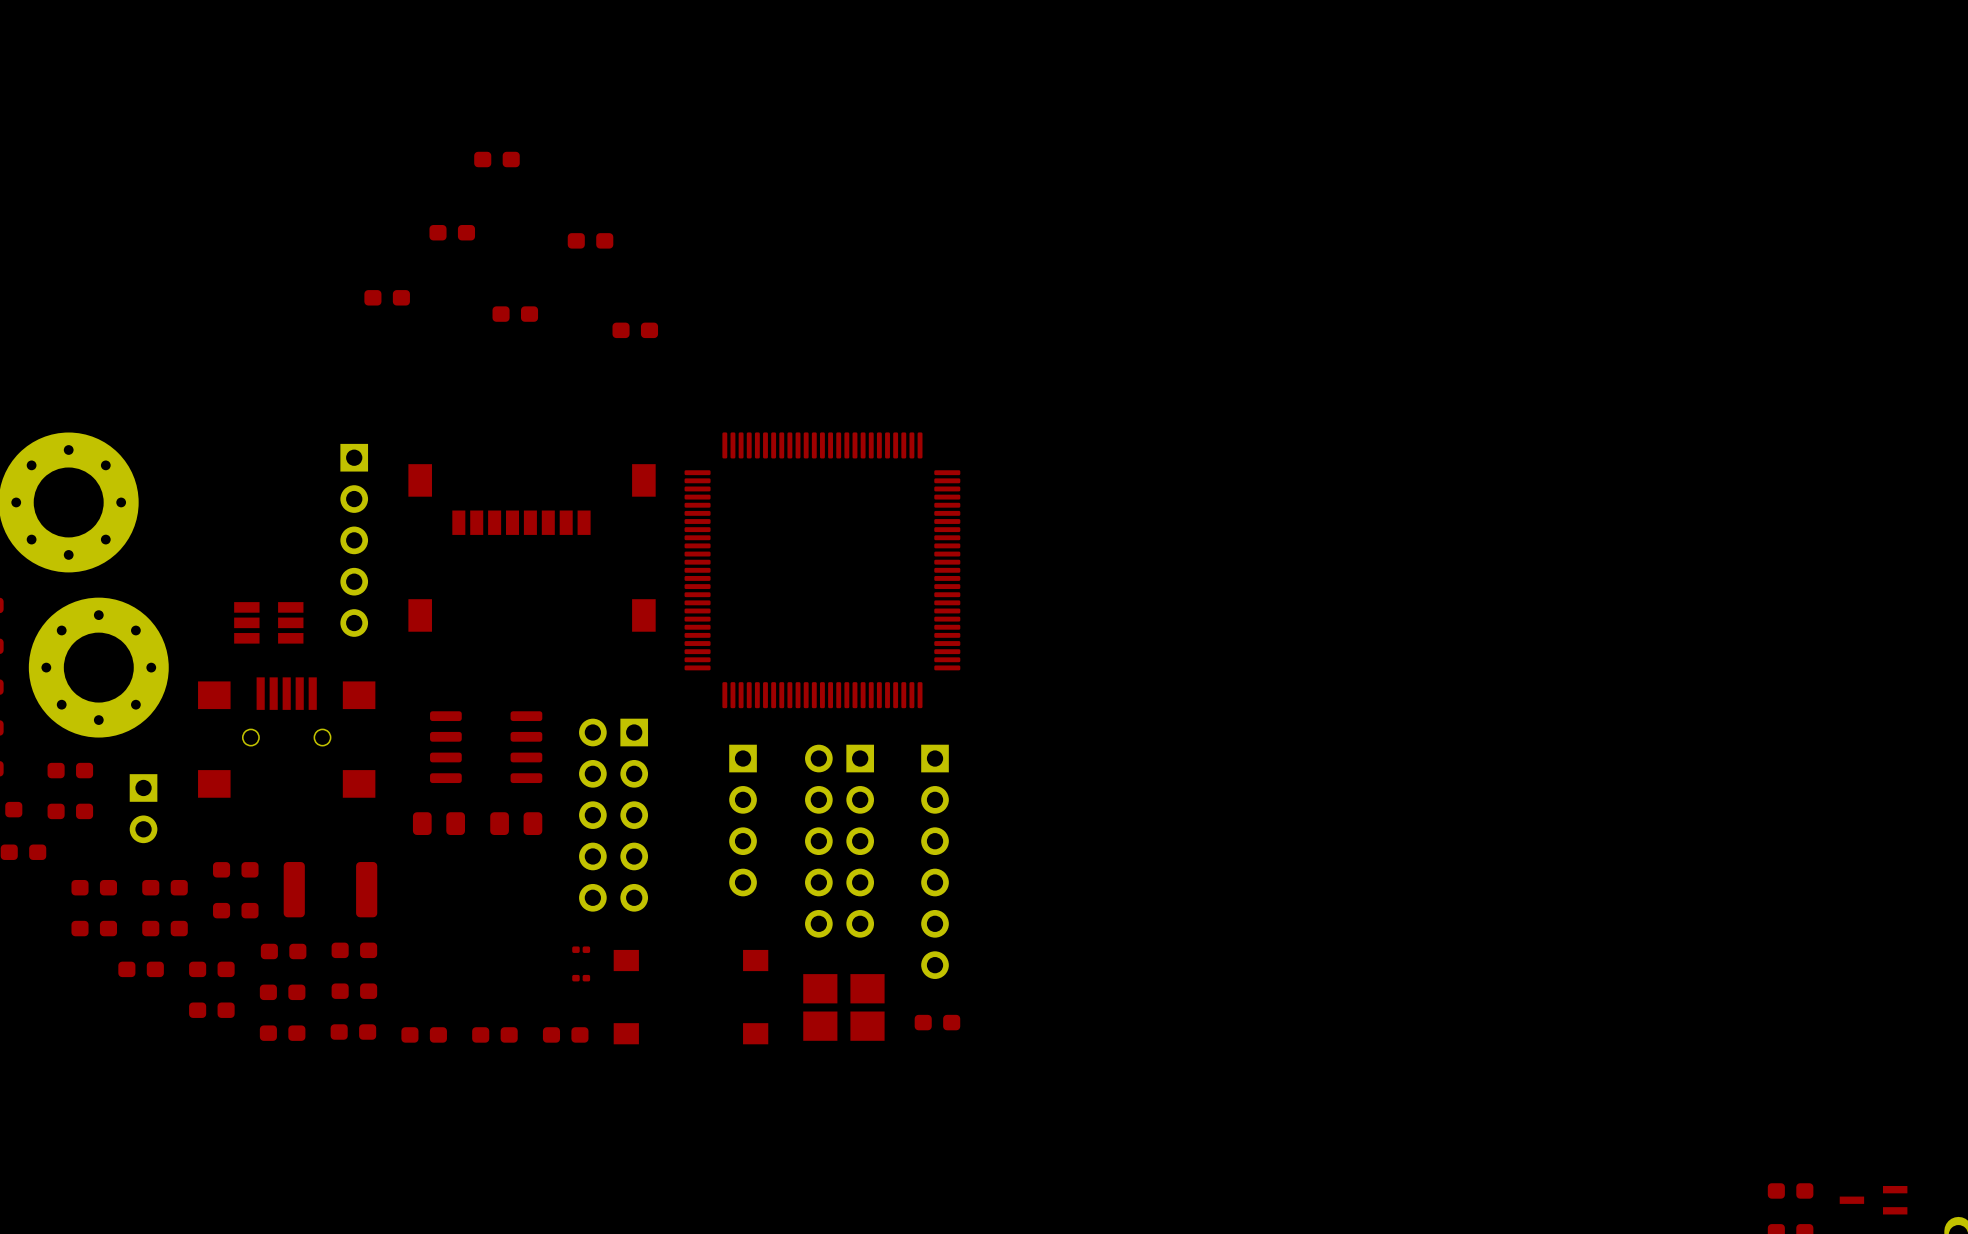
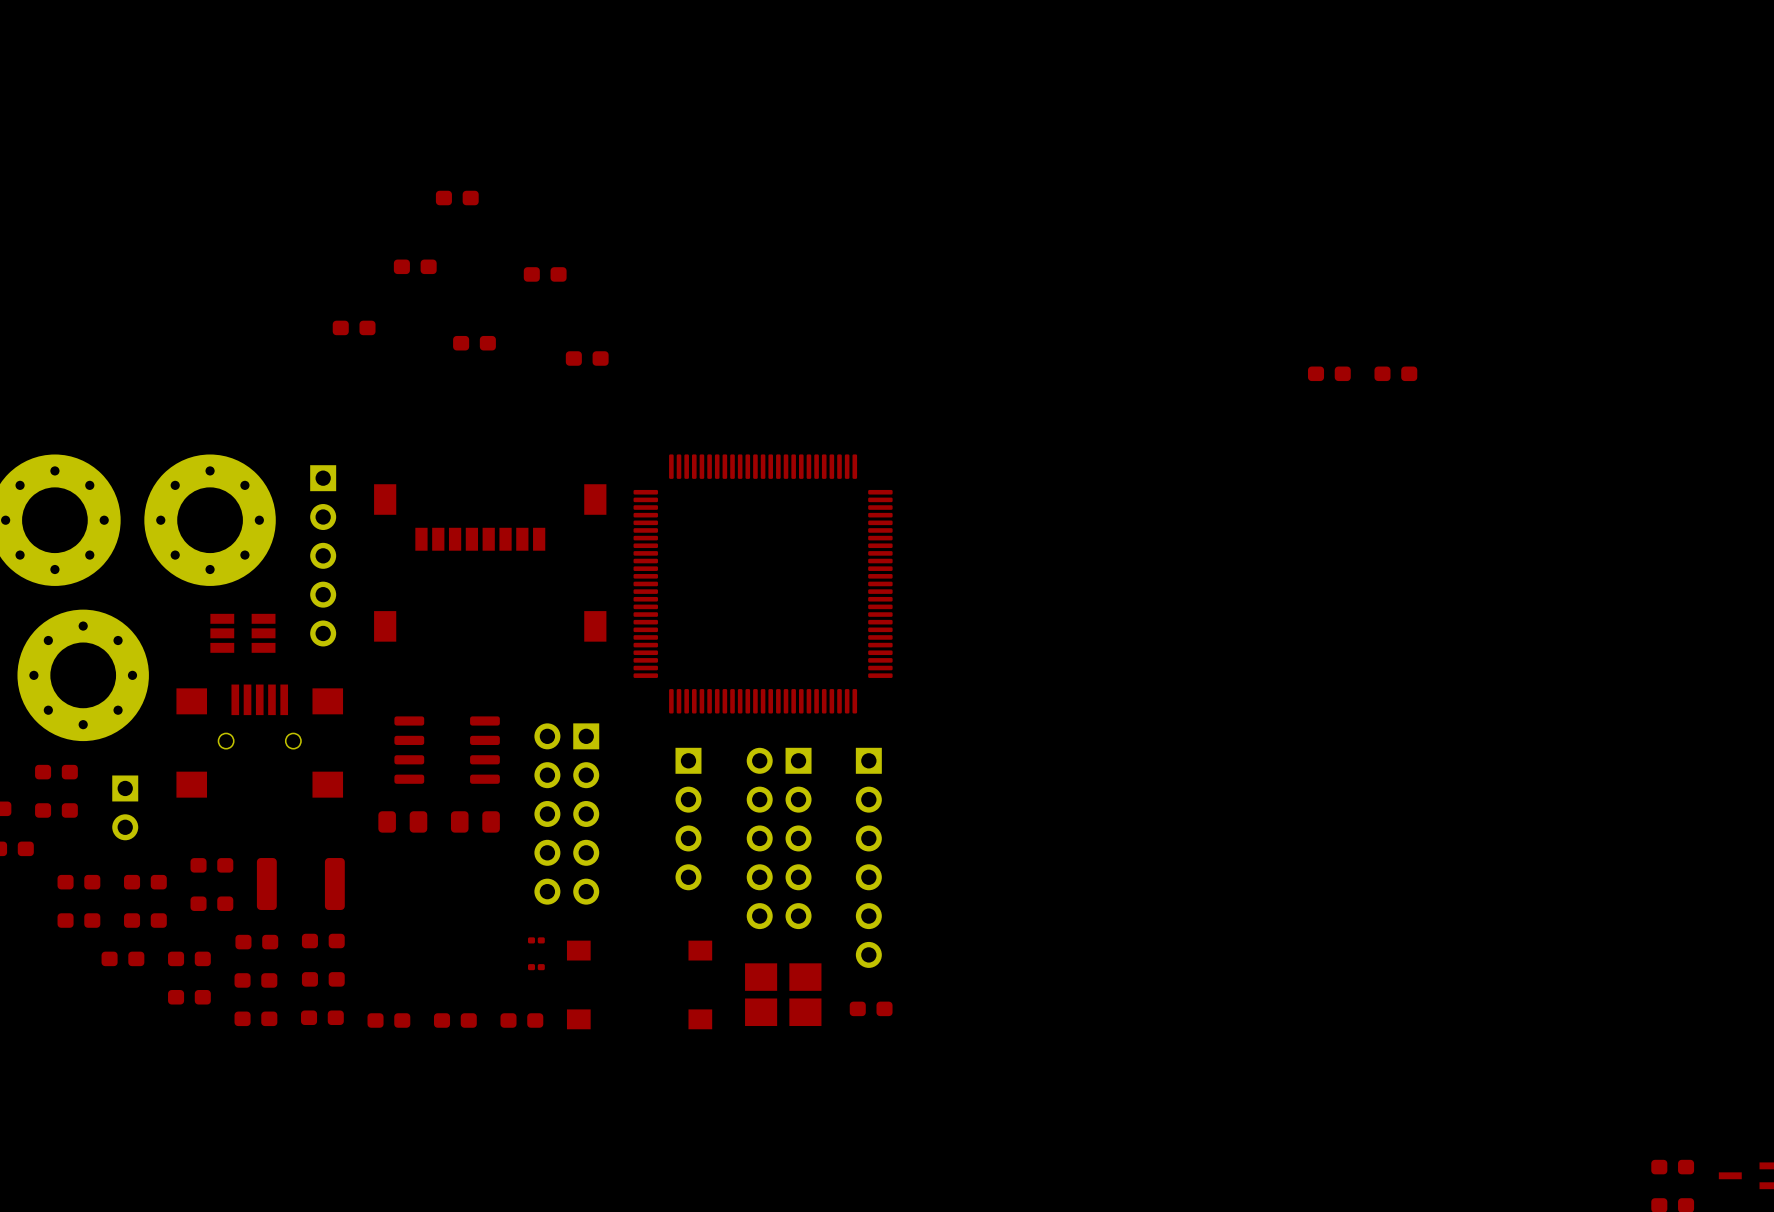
part: none -> (1329, 373)
part: none -> (1395, 373)
part: none -> (210, 520)

